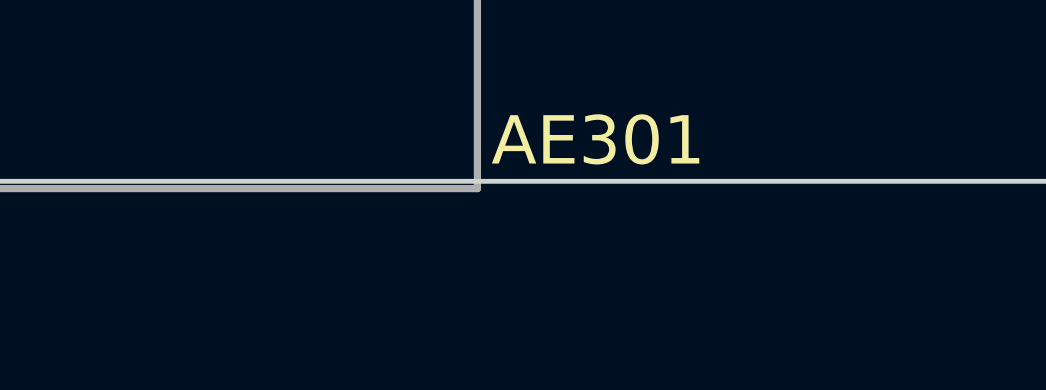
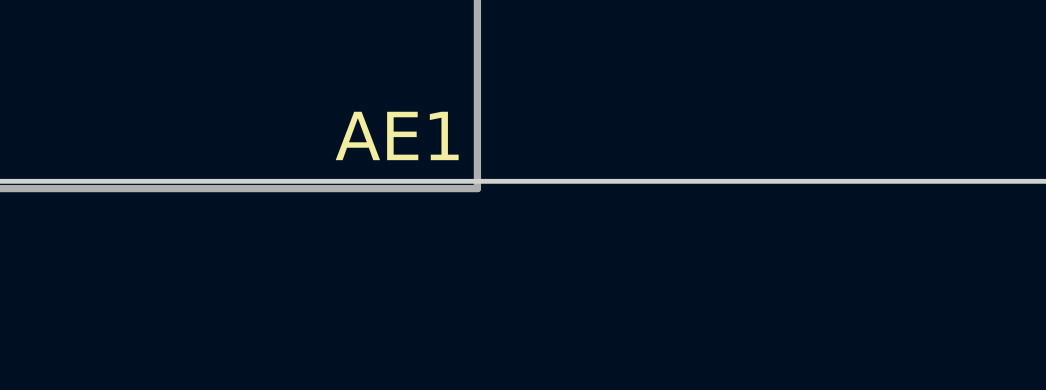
AE301 name: AE301 (595, 139) -> AE1 (397, 135)

